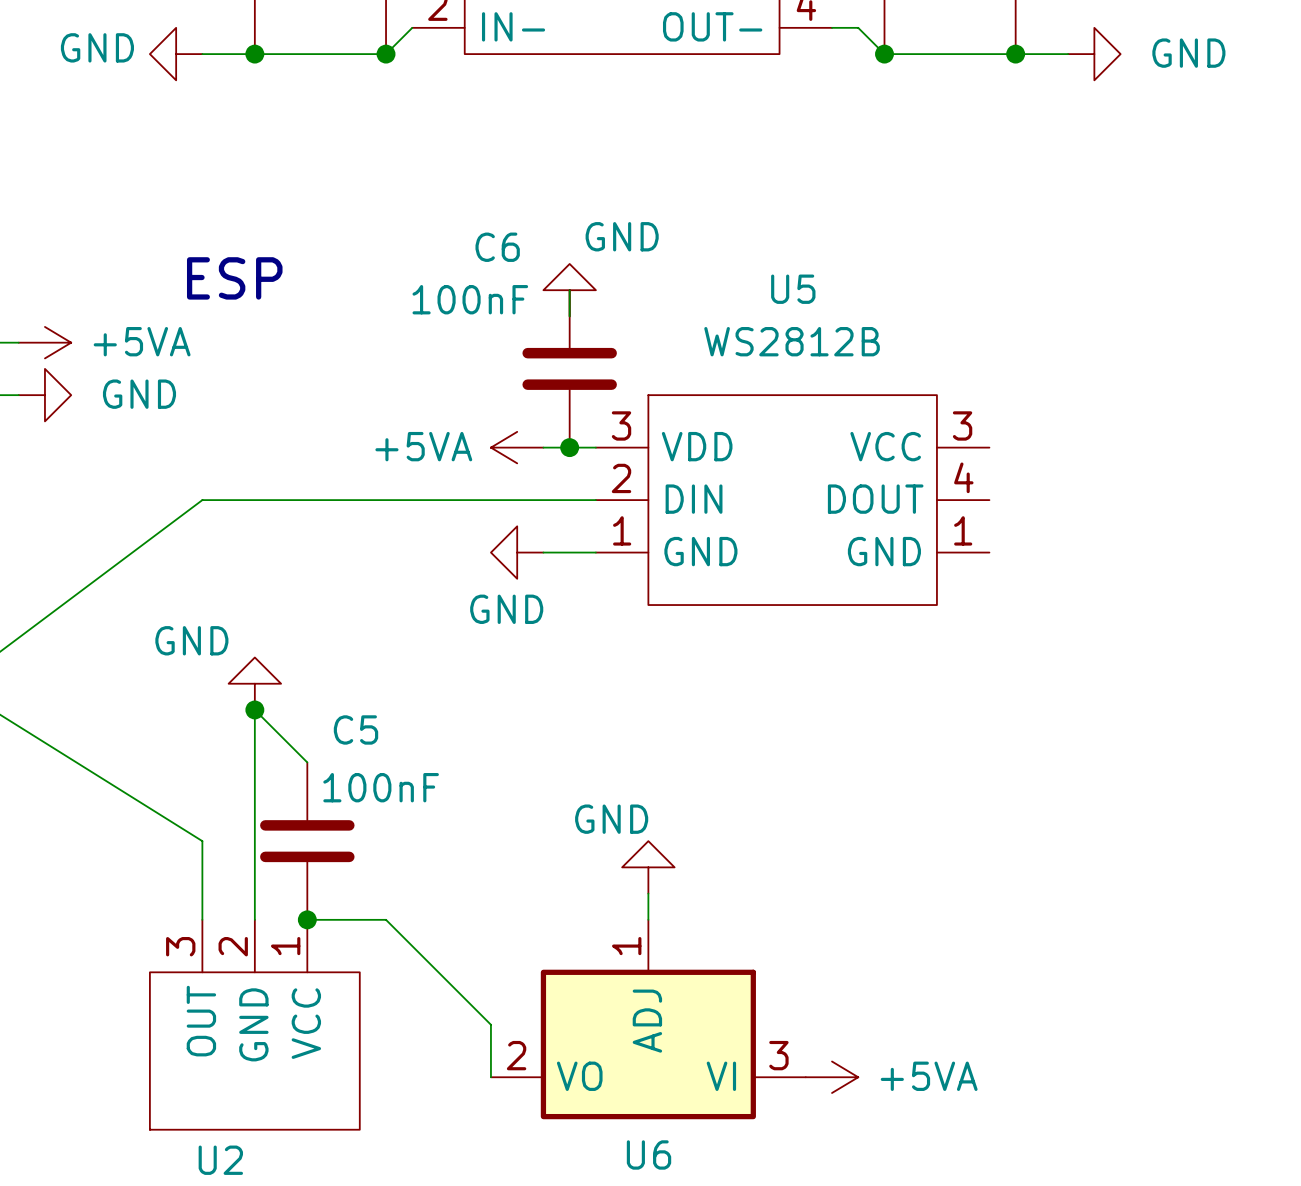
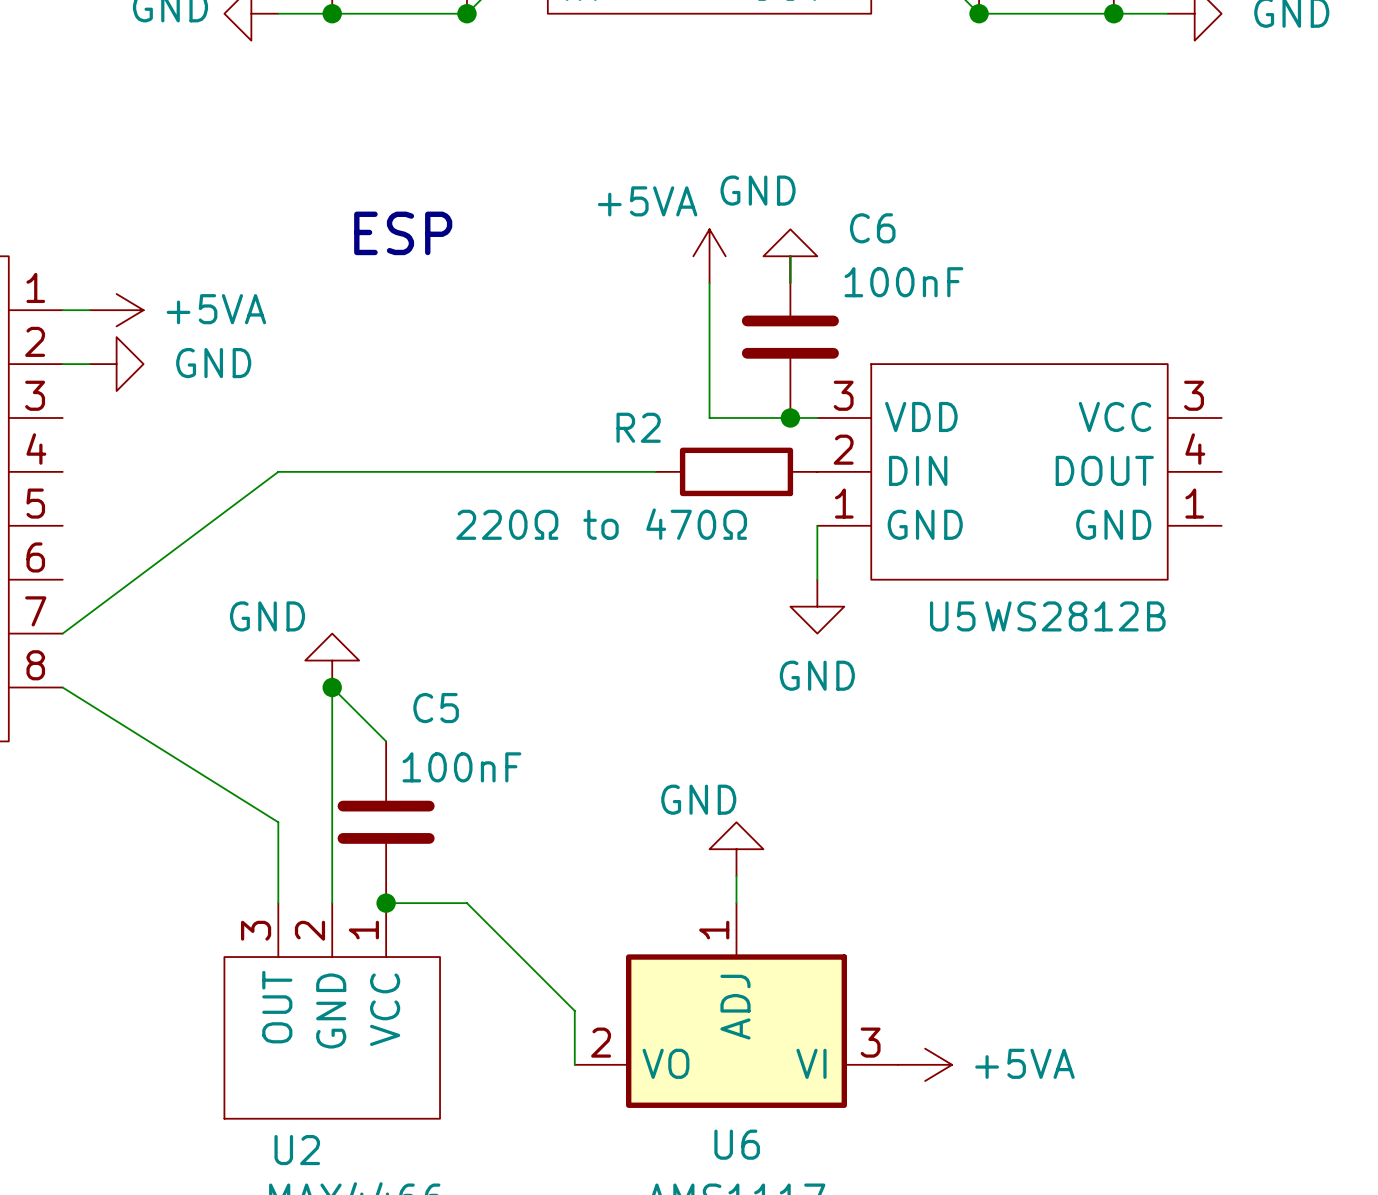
power symbol text position: GND (622, 236) -> GND (758, 190)
C6 name position: C6 (497, 247) -> C6 (872, 228)
text position: ESP (234, 278) -> ESP (403, 233)
U5 name position: U5 (793, 289) -> U5 (952, 616)
wire: (569, 290) (569, 316) -> (790, 256) (790, 283)
power symbol position: GND (569, 290) -> GND (790, 256)
C6 value position: 100nF (470, 299) -> 100nF (903, 282)
wire: none -> (709, 283) (709, 417) (817, 417)
U5 value position: WS2812B (792, 341) -> WS2812B (1075, 616)
C6 position: (569, 368) -> (790, 337)
power symbol text position: +5VA (423, 446) -> +5VA (647, 201)
power symbol rotation: 0° (517, 447) -> 90° clockwise (709, 256)
power symbol position: +5VA (517, 447) -> +5VA (709, 256)
wire: (543, 447) (595, 447) -> none
junction: (569, 447) -> none
junction: none -> (790, 417)
R2: none -> 220Ω to 470Ω (736, 471)
U5 position: (792, 500) -> (1019, 471)
power symbol: GND (517, 552) -> none
wire: (543, 552) (595, 552) -> none
wire: none -> (817, 525) (817, 579)
power symbol: none -> GND (817, 606)

